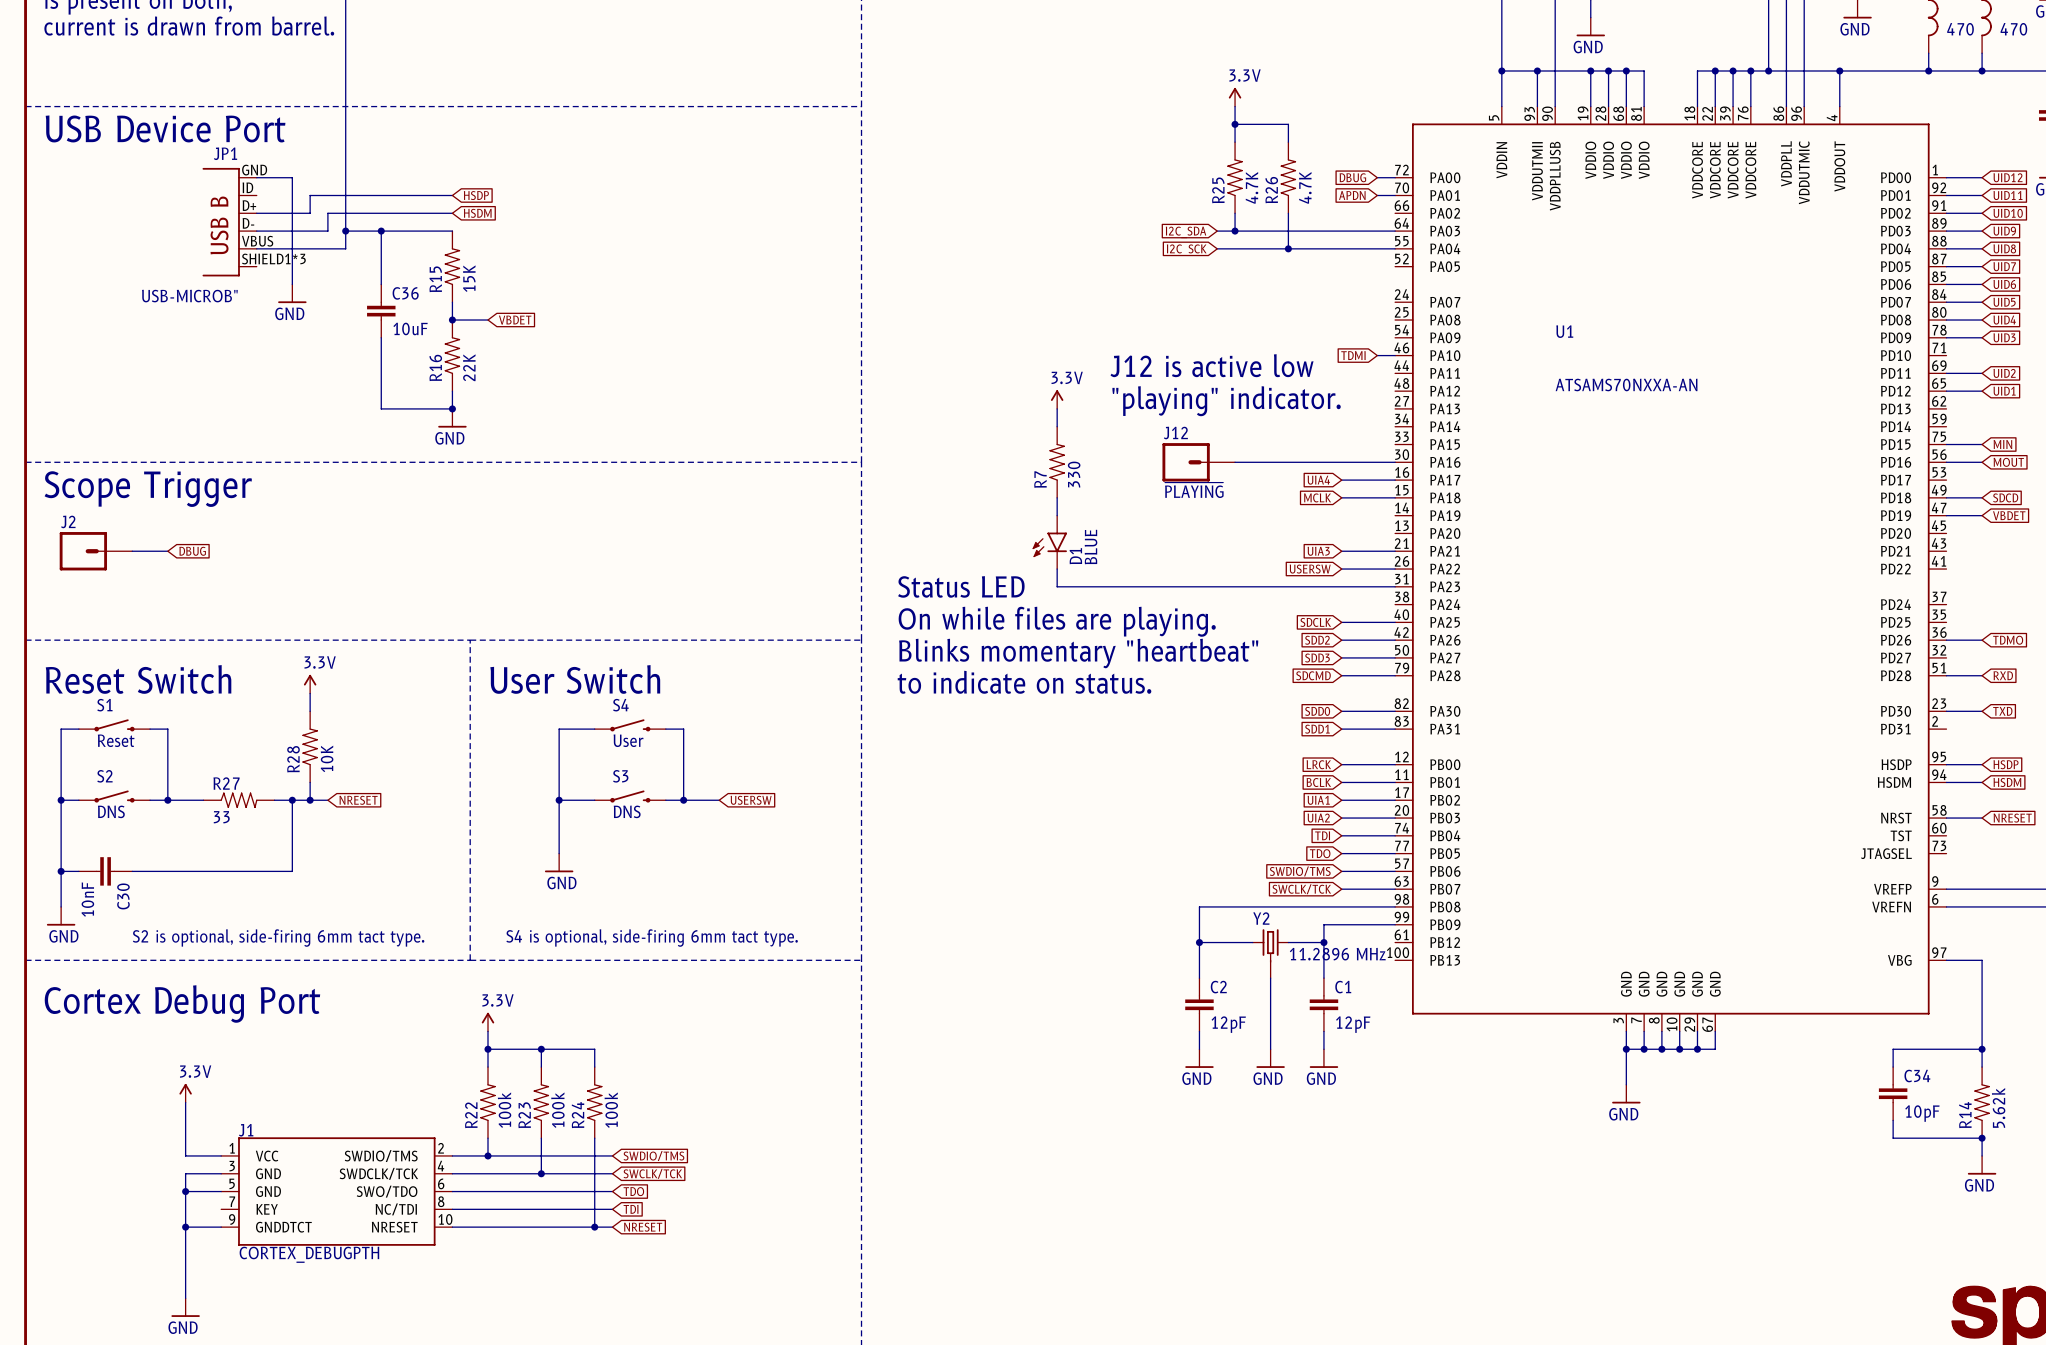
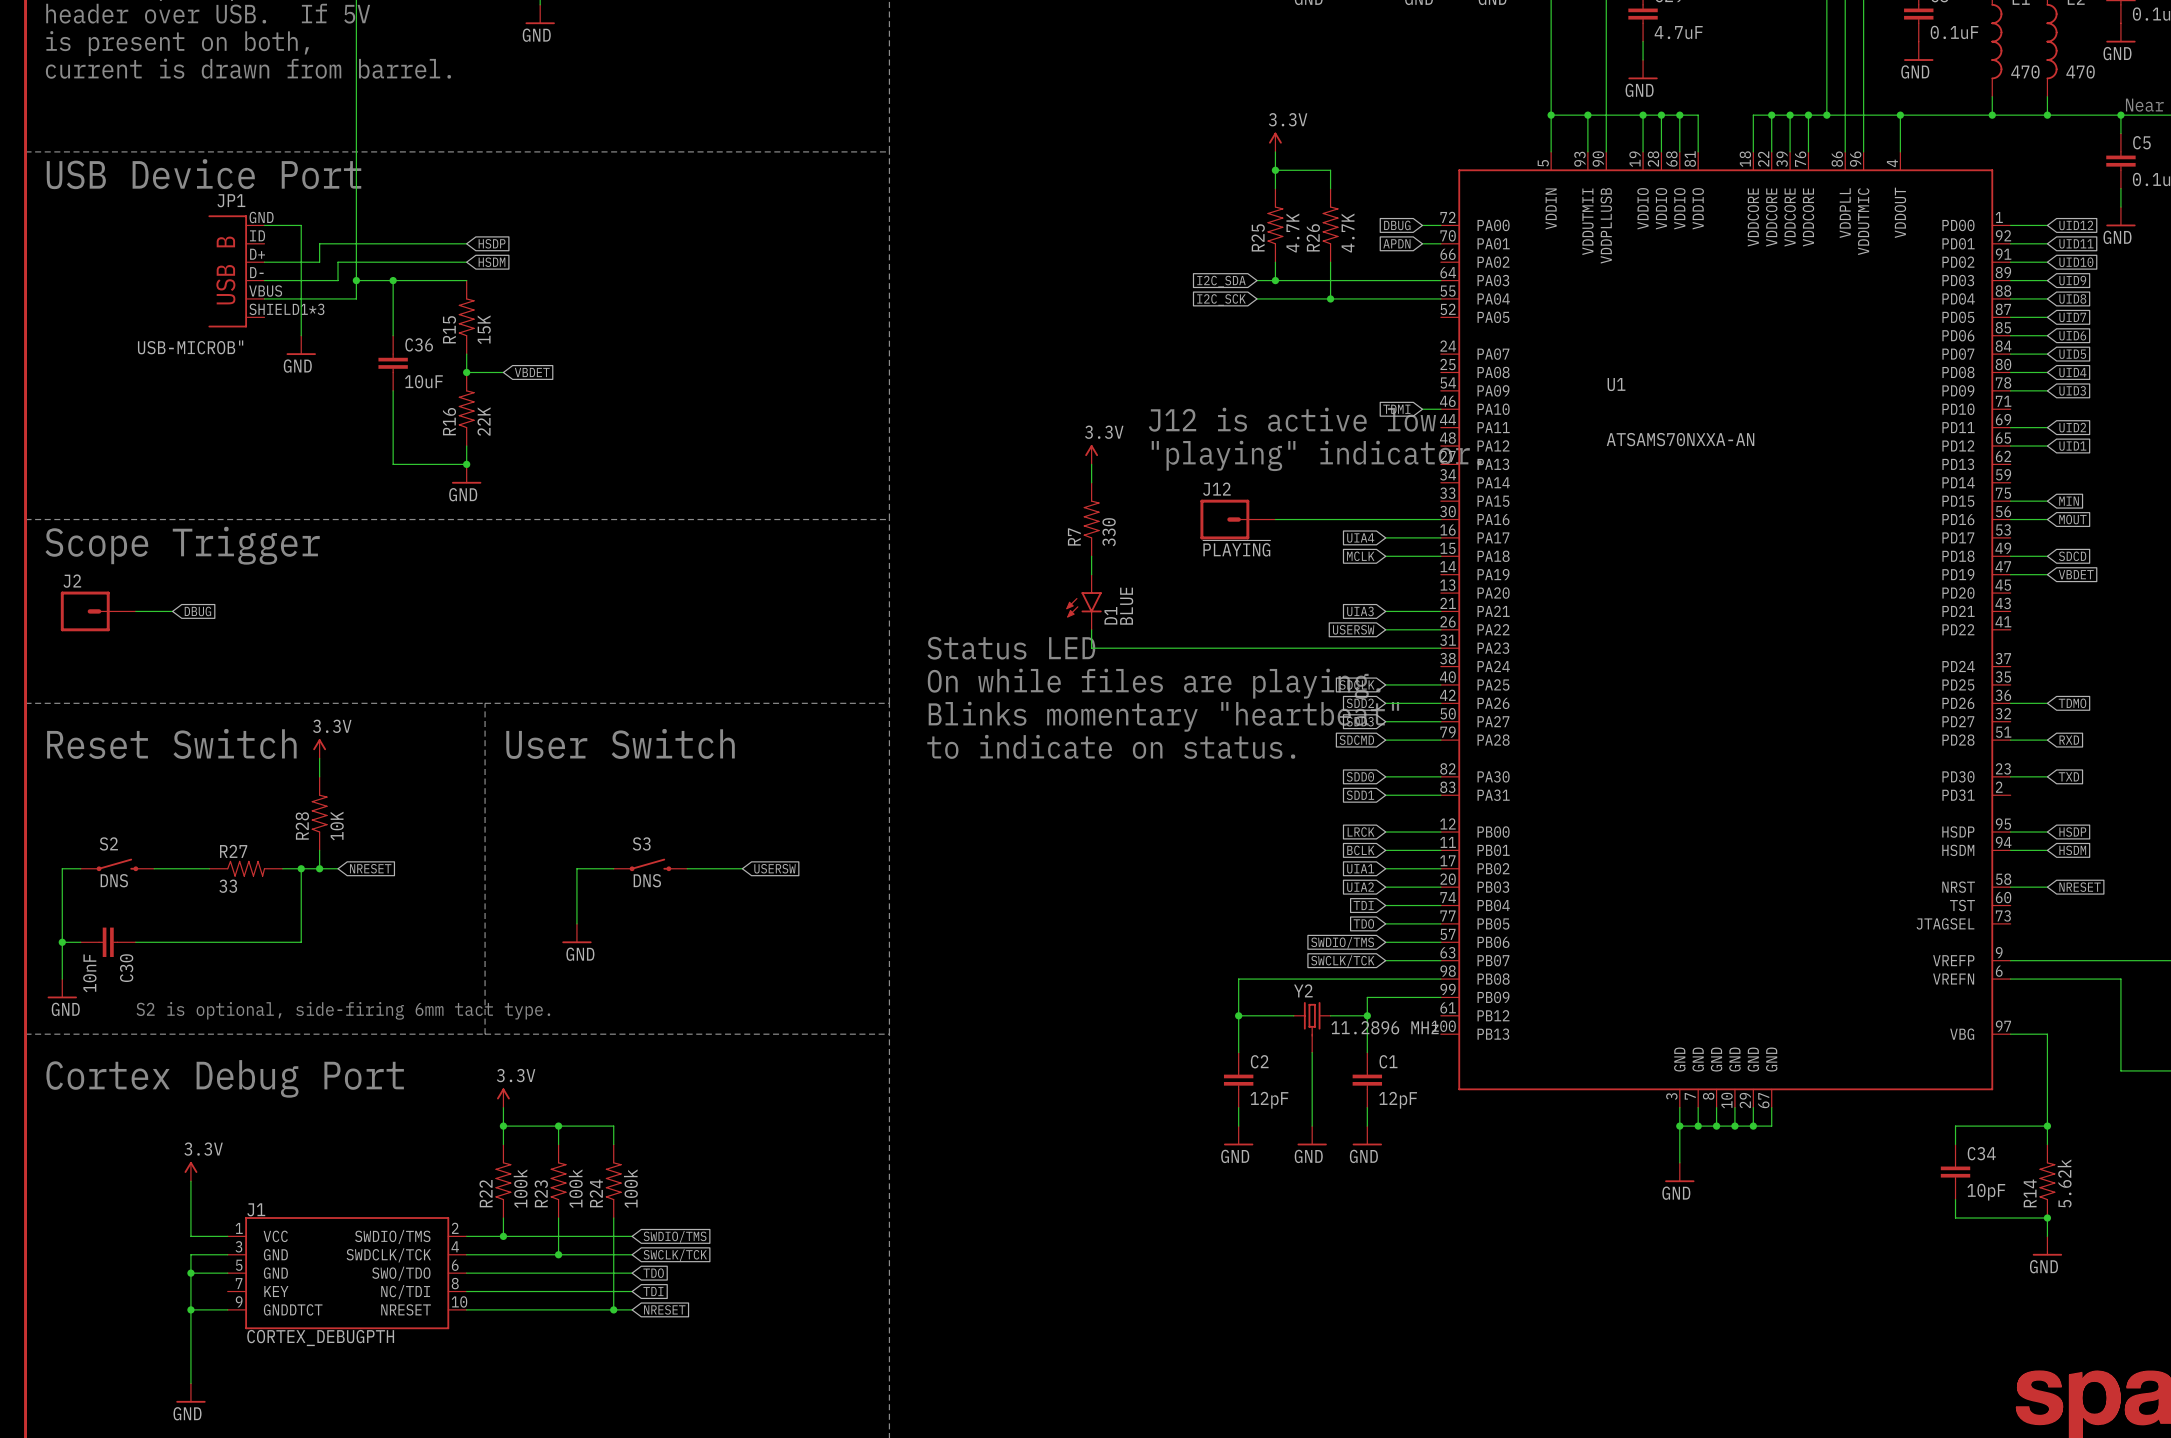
S1: Reset (114, 725) -> none
S4: User (630, 725) -> none
wire: (78, 729) (61, 729) (61, 800) -> none
wire: (150, 729) (167, 729) (167, 800) -> none
wire: (594, 729) (559, 729) (559, 800) -> none
wire: (665, 729) (683, 729) (683, 800) -> none
junction: (61, 800) -> none
junction: (167, 800) -> none
junction: (559, 800) -> none
junction: (683, 800) -> none
text: S4 is optional, side-firing 6mm tact type. (652, 938) -> none

